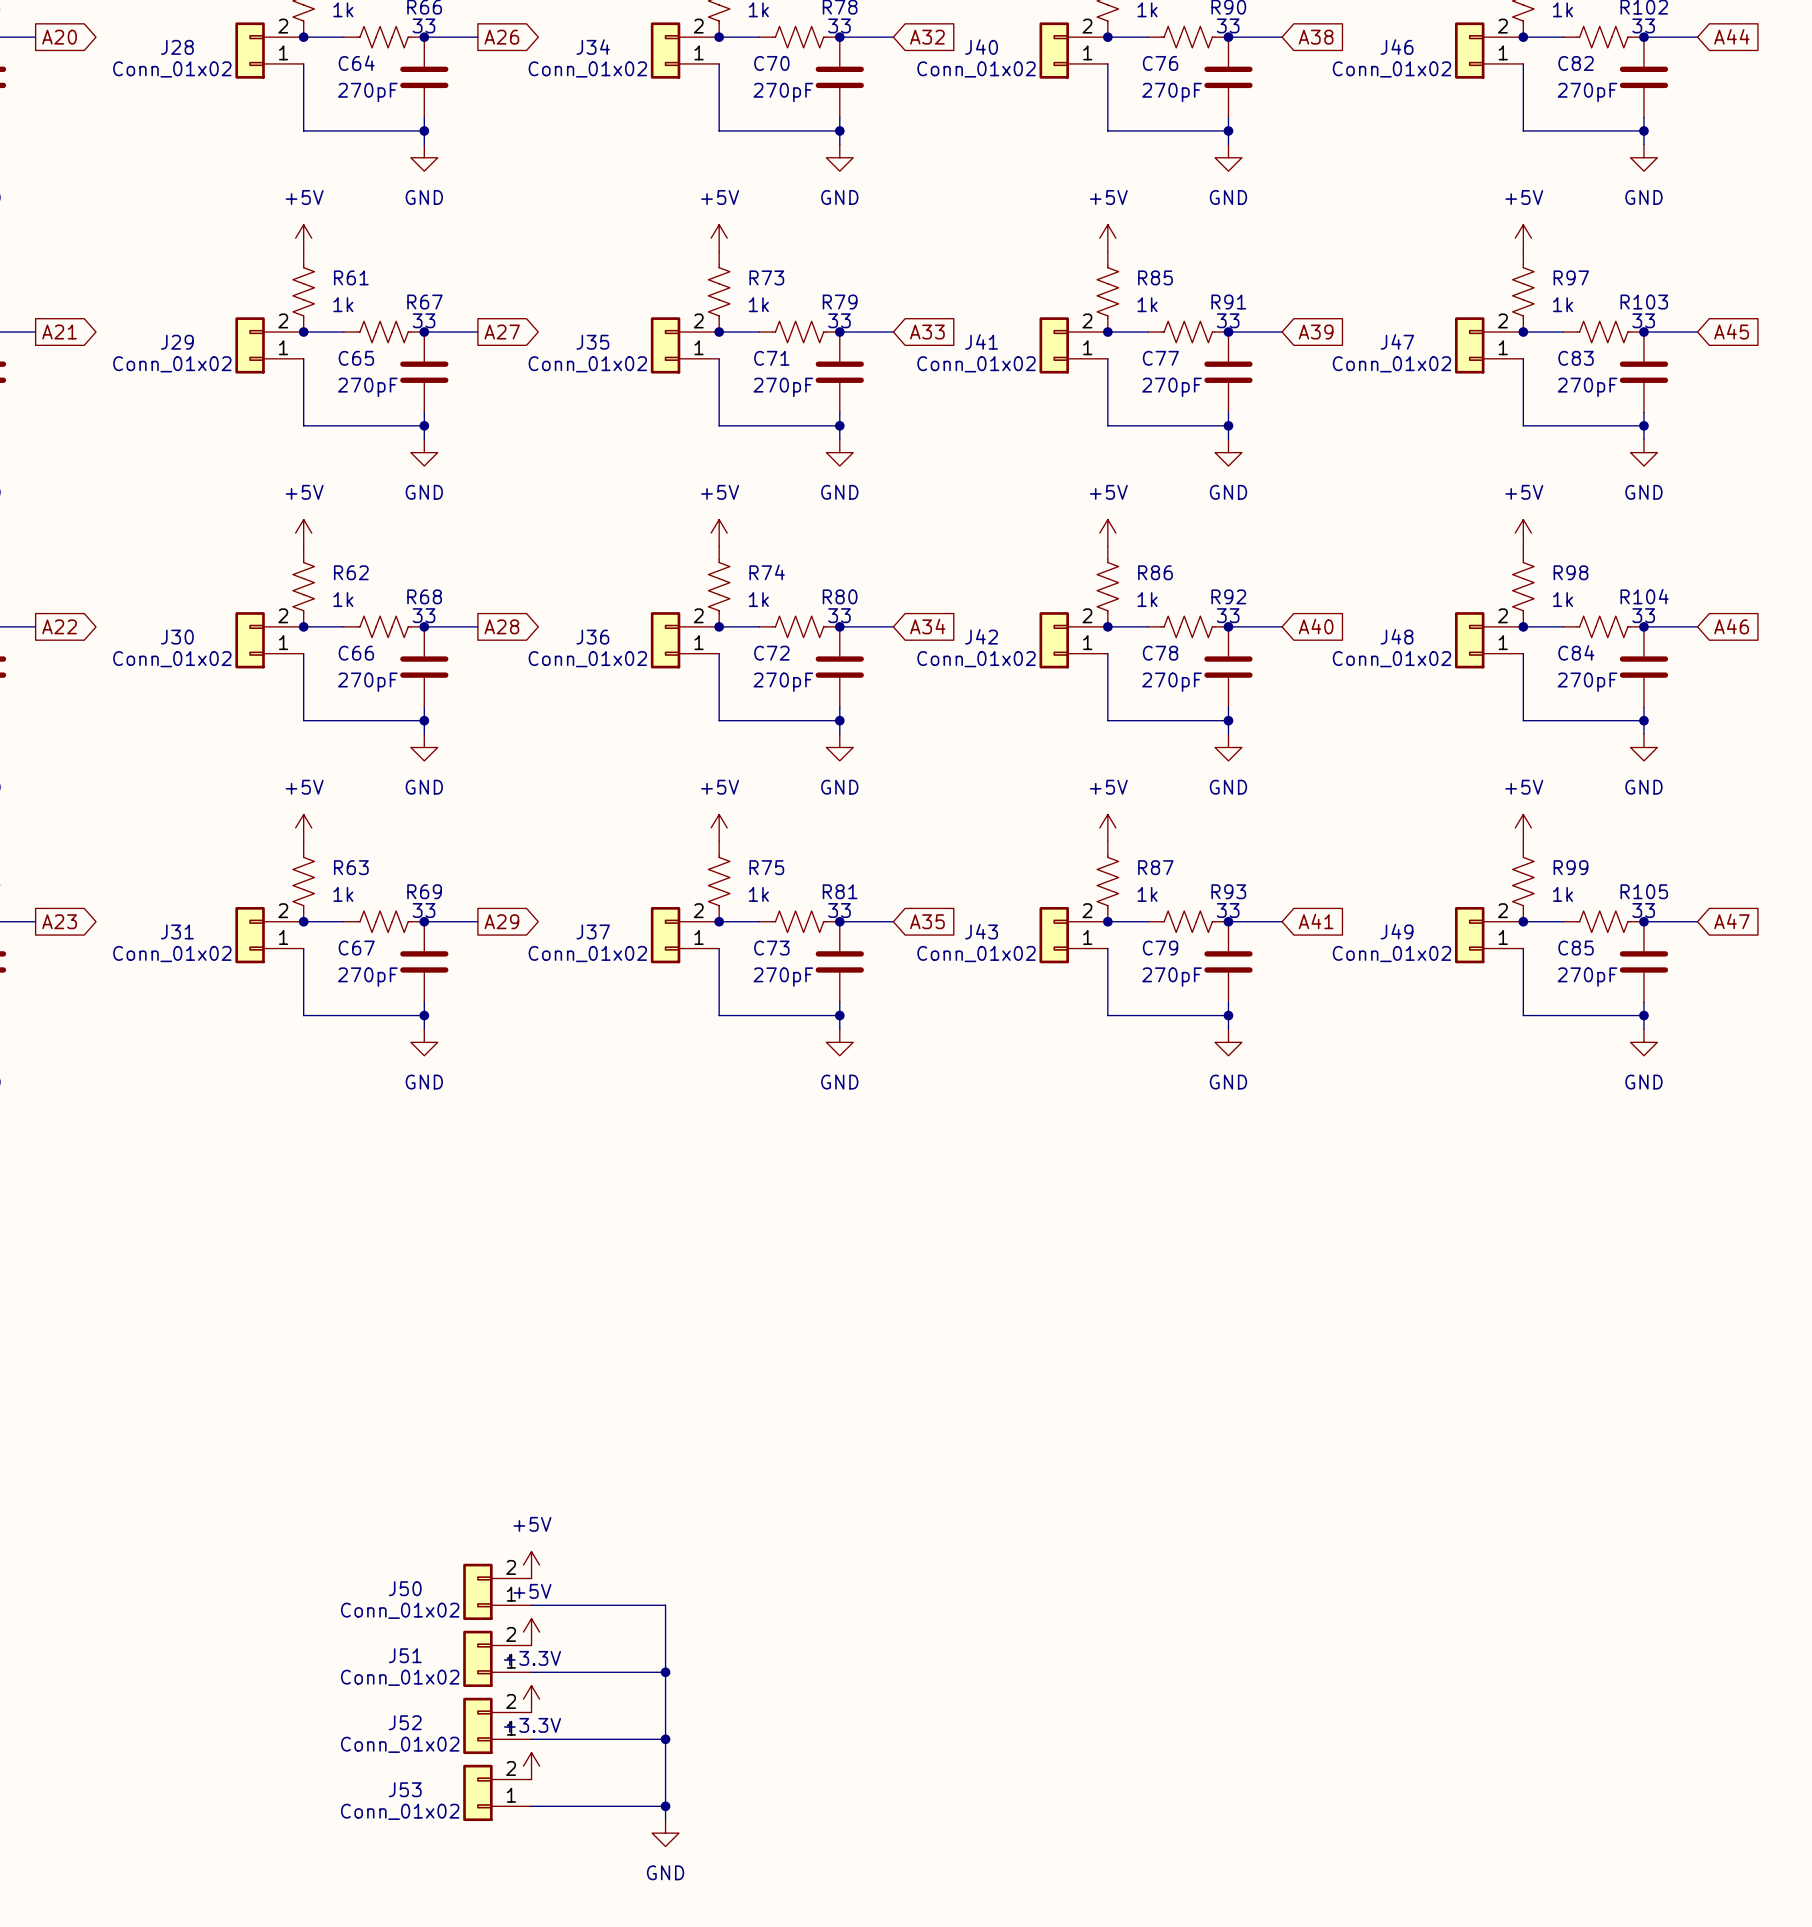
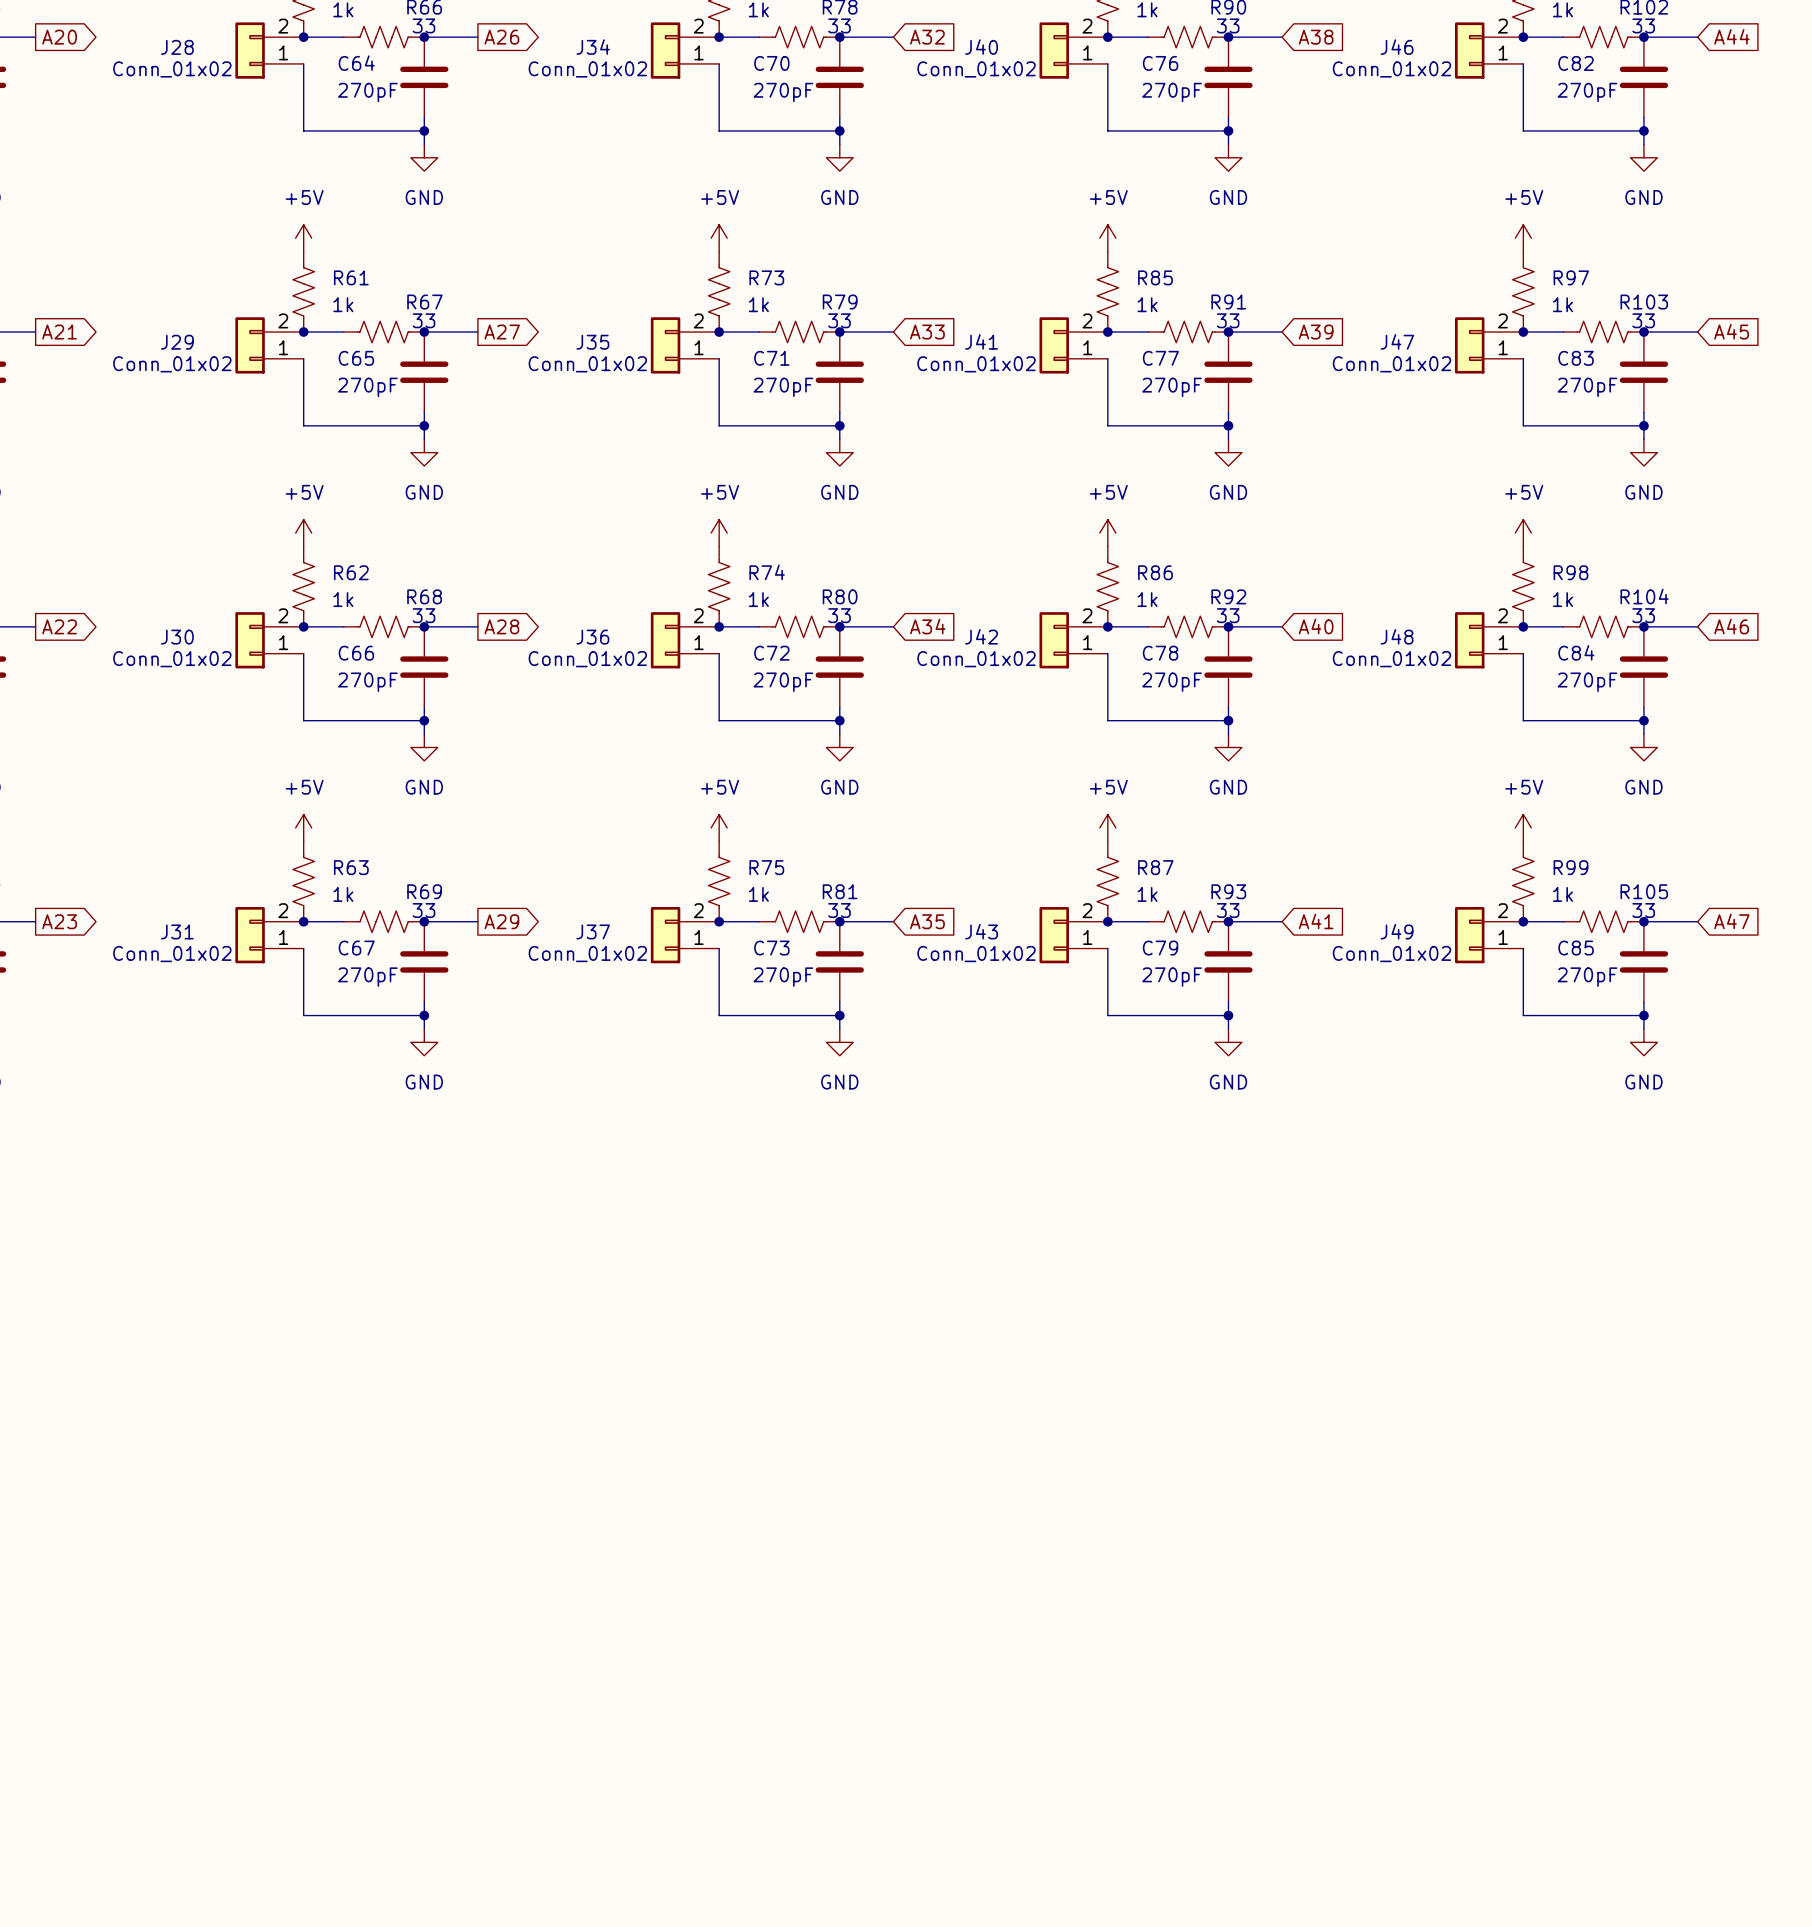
power symbol: +5V (531, 1565) -> none
J50: Conn_01x02 (497, 1591) -> none
wire: (531, 1605) (665, 1605) (665, 1819) -> none
power symbol: +5V (531, 1632) -> none
J51: Conn_01x02 (497, 1658) -> none
wire: (531, 1672) (665, 1672) -> none
junction: (665, 1672) -> none
power symbol: +3.3V (531, 1699) -> none
J52: Conn_01x02 (497, 1725) -> none
wire: (531, 1739) (665, 1739) -> none
junction: (665, 1739) -> none
power symbol: +3.3V (531, 1766) -> none
J53: Conn_01x02 (497, 1792) -> none
wire: (531, 1806) (665, 1806) -> none
junction: (665, 1806) -> none
power symbol: GND (665, 1833) -> none

